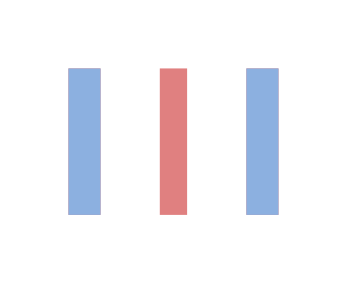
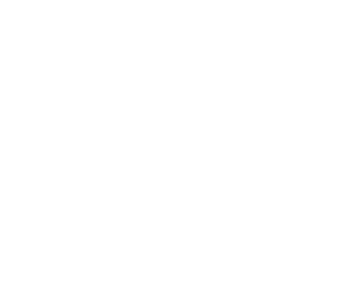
part: (173, 141) -> none

